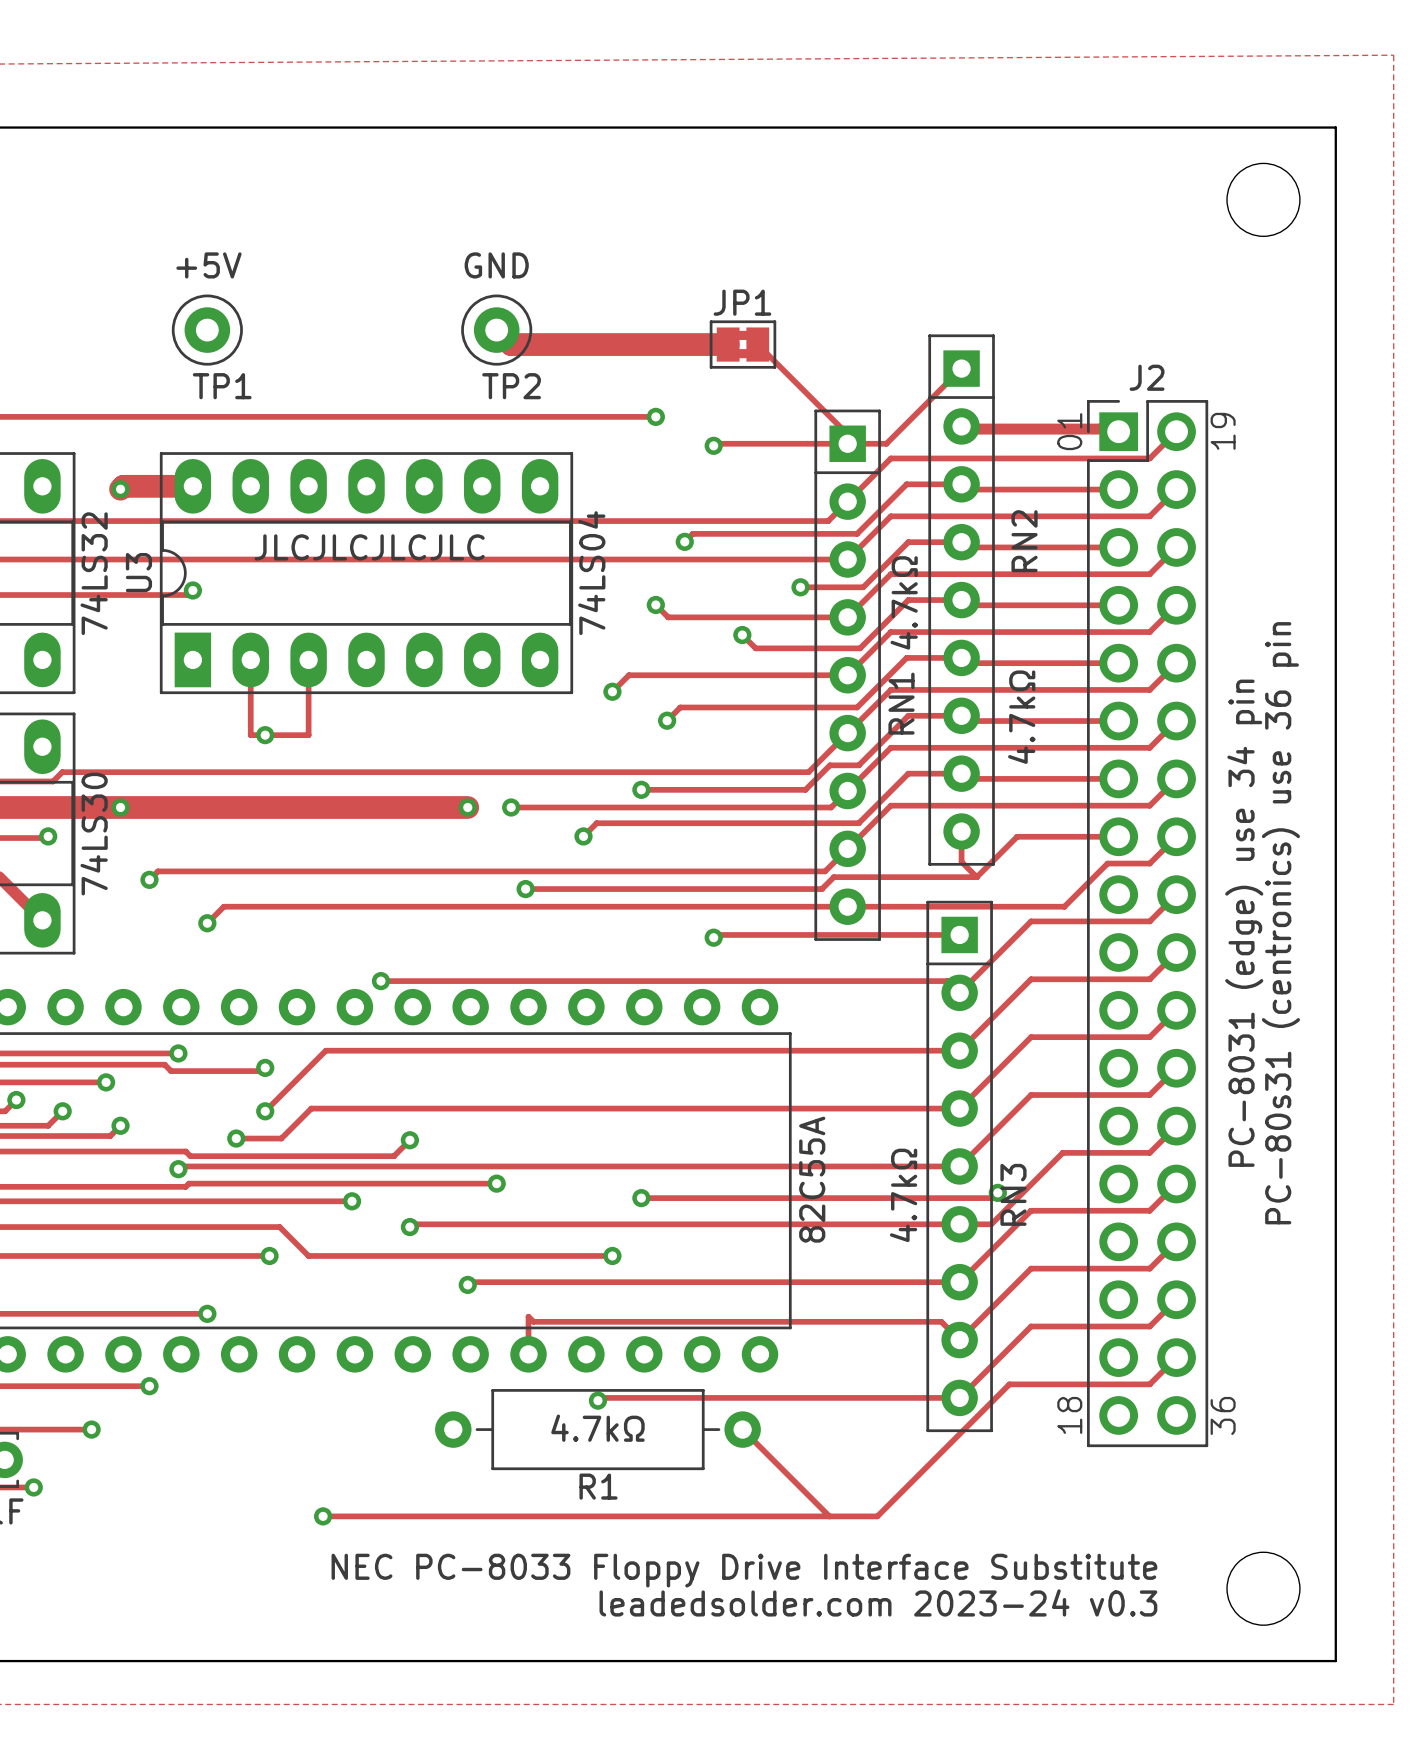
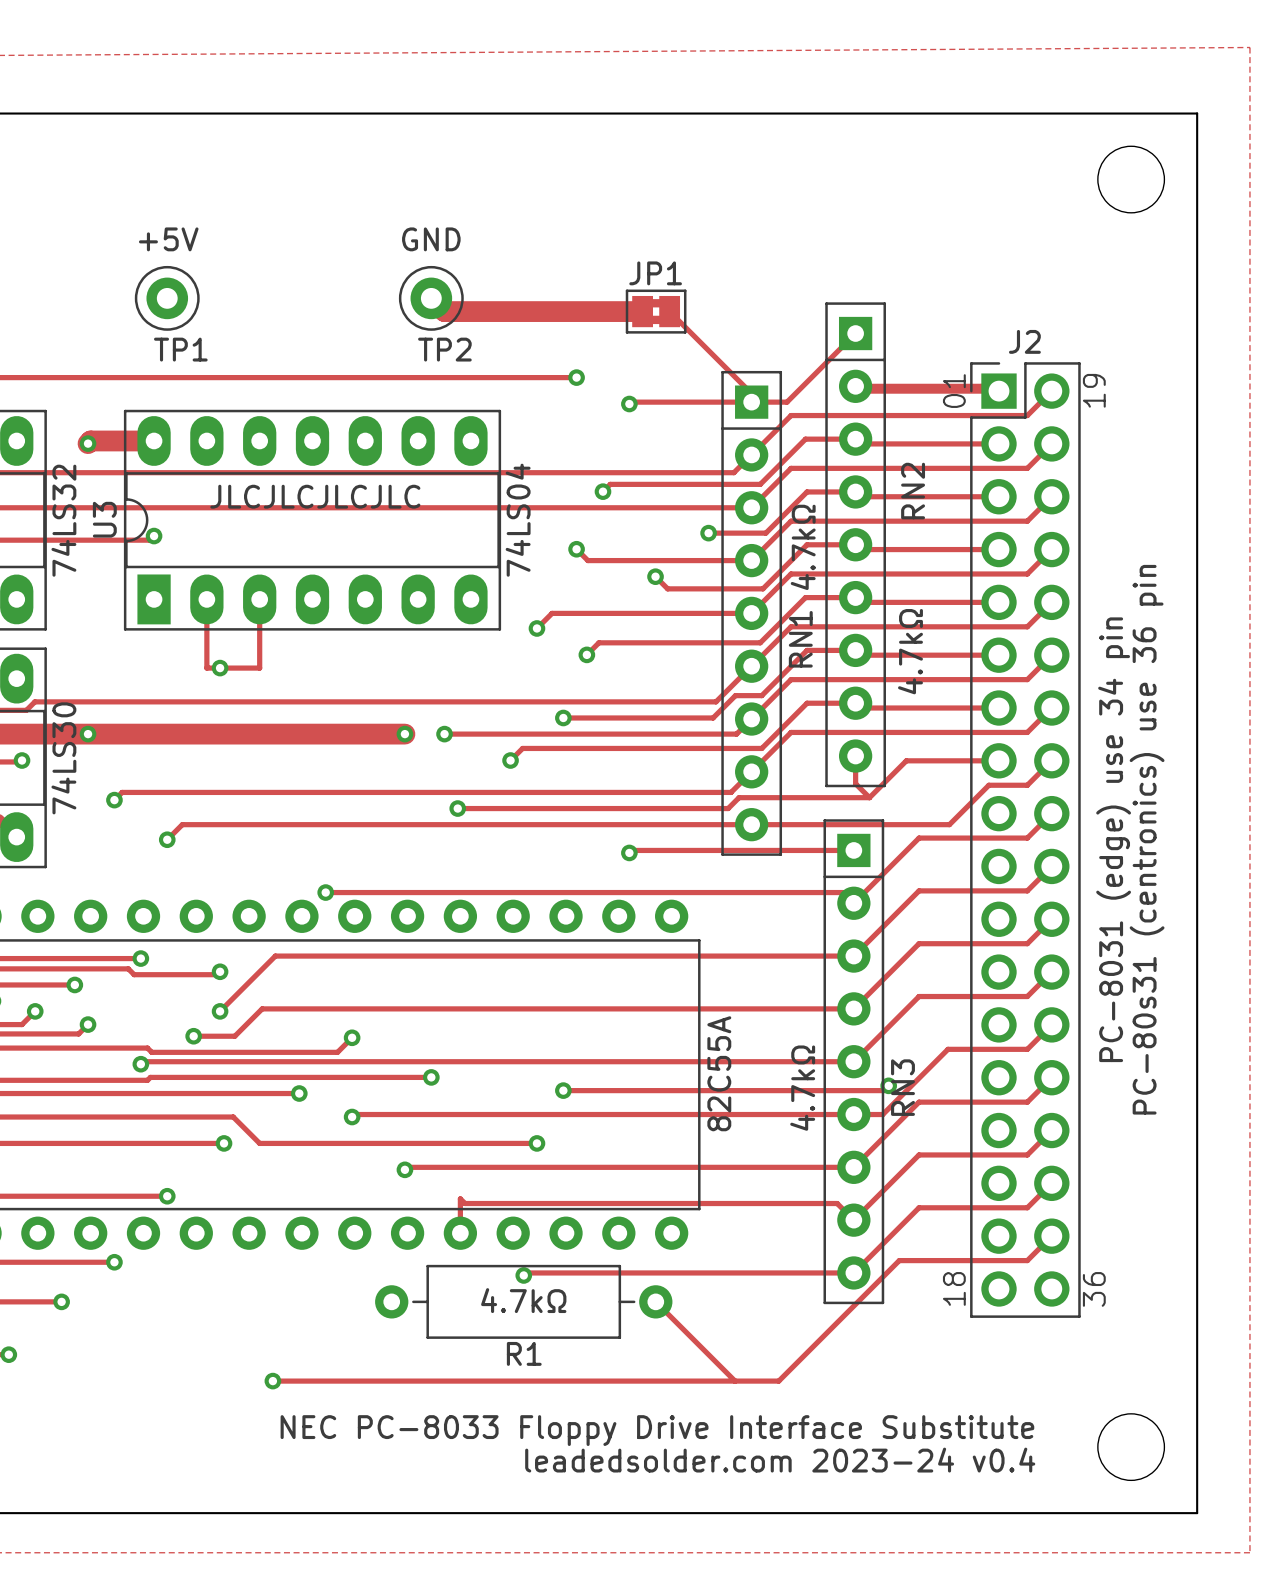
text: leadedsolder.com 2023-24 v0.3 (878, 1602) -> leadedsolder.com 2023-24 v0.4 (780, 1460)

